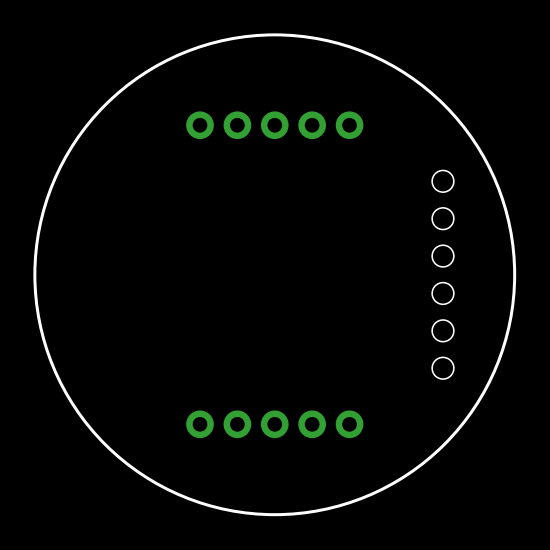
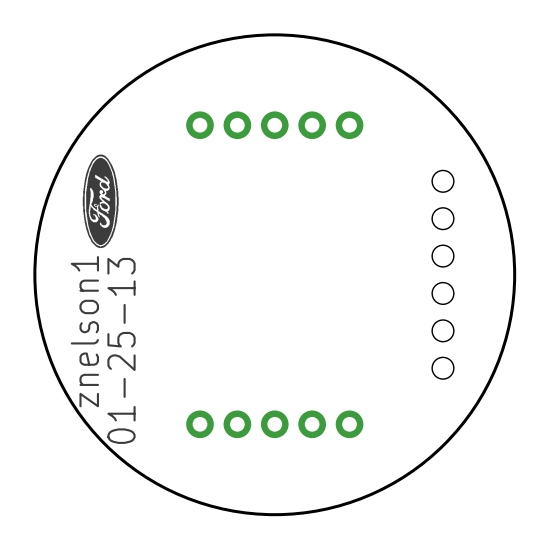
drawing: none -> [82, 154, 119, 249]
text: none -> znelson1 (84, 331)
text: none -> 01-25-13 (121, 350)

